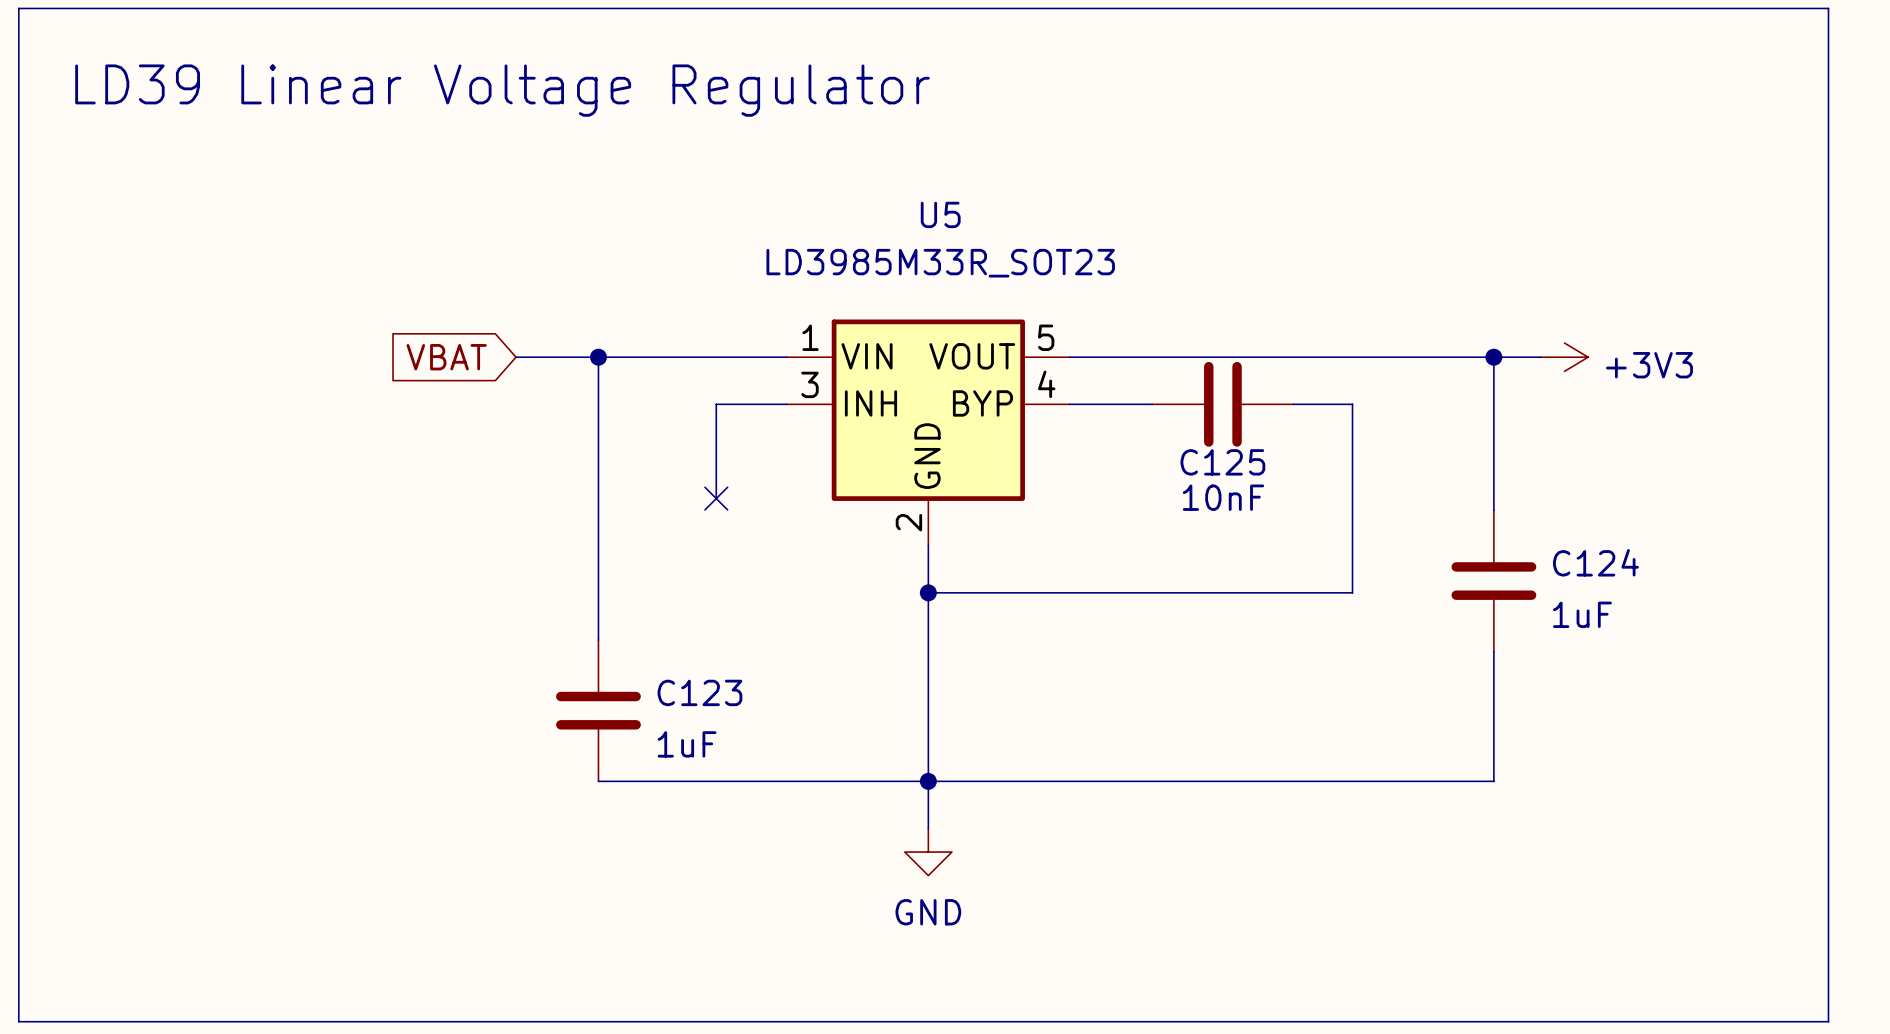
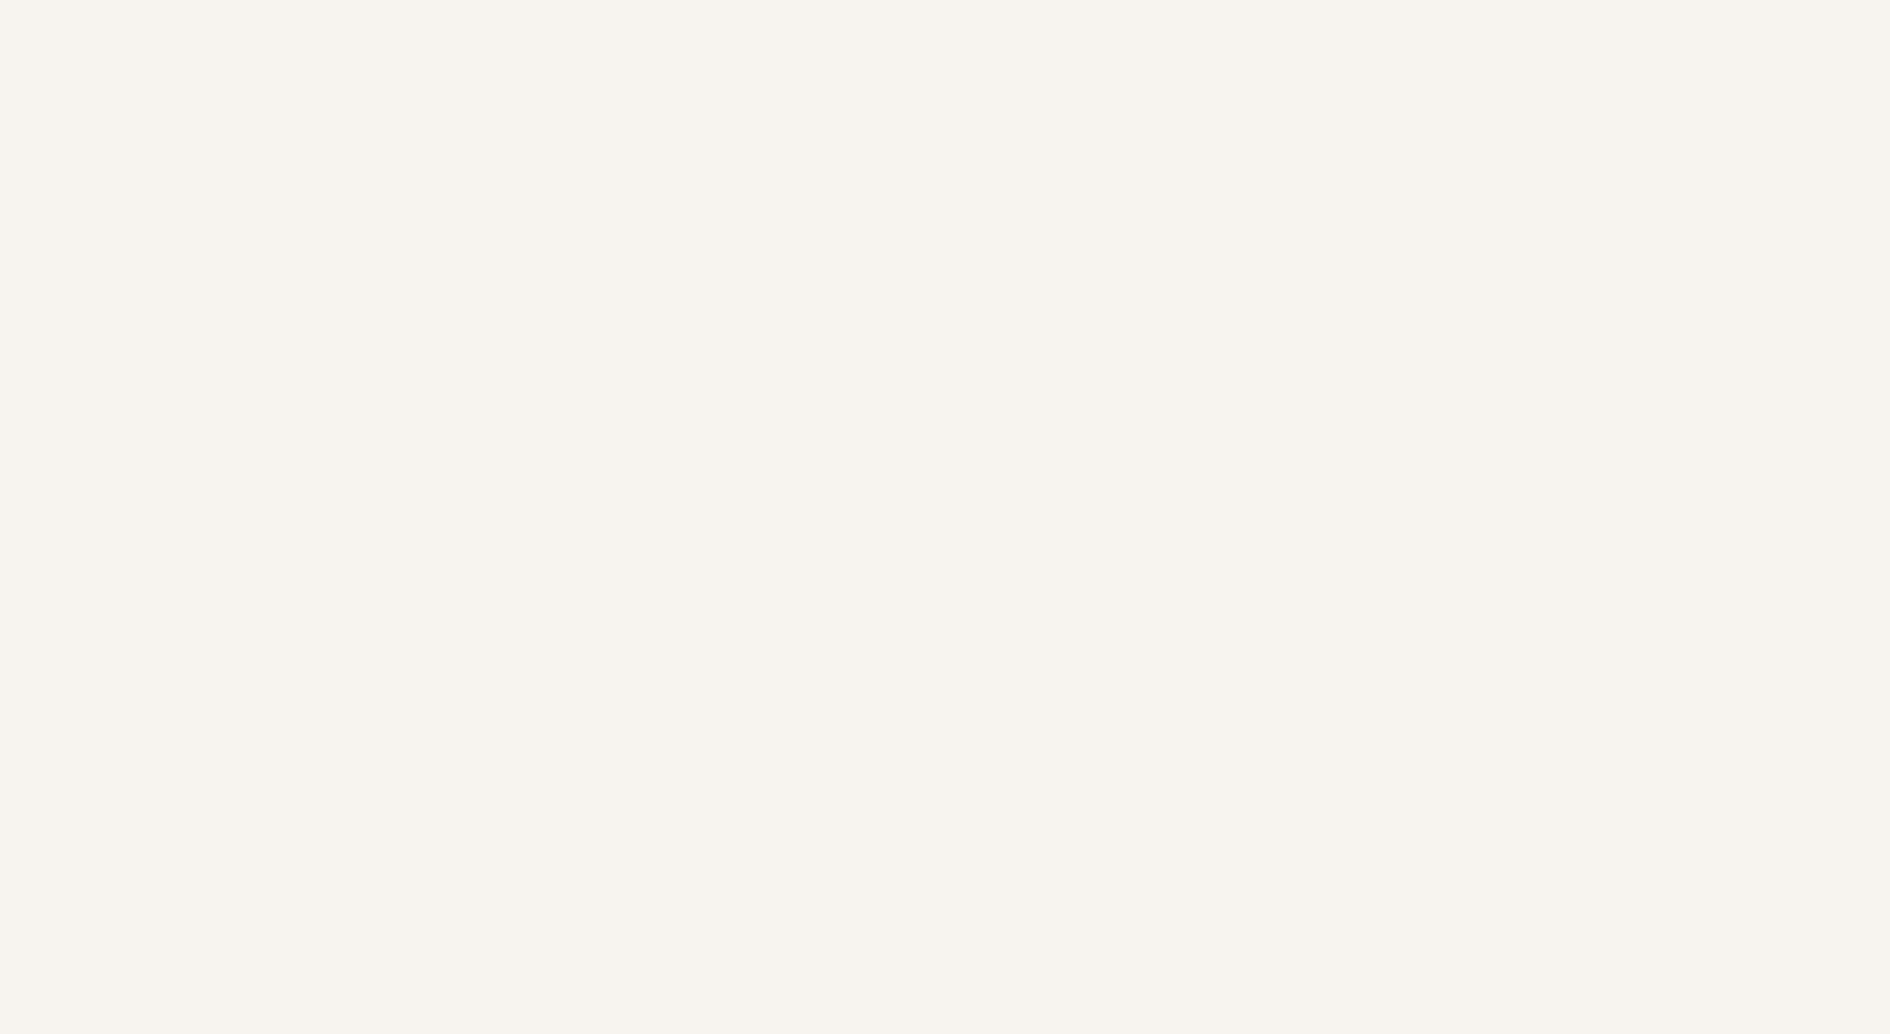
line: (18, 8) (1828, 8) (1828, 1021) (18, 1021) (18, 8) -> none
text: LD39 Linear Voltage Regulator (502, 90) -> none
global label: VBAT (446, 357) -> none
wire: (515, 357) (786, 357) -> none
wire: (598, 357) (598, 639) -> none
junction: (598, 357) -> none
wire: (1069, 357) (1541, 357) -> none
wire: (1493, 357) (1493, 510) -> none
junction: (1493, 357) -> none
power symbol: +3V3 (1564, 357) -> none
wire: (786, 404) (716, 404) (716, 498) -> none
wire: (1069, 404) (1152, 404) -> none
C125: 10nF (1222, 404) -> none
wire: (1293, 404) (1352, 404) (1352, 592) (928, 592) -> none
U5: LD3985M33R_SOT23 (928, 432) -> none
no-connect mark: (716, 498) -> none
wire: (928, 545) (928, 828) -> none
C124: 1uF (1493, 581) -> none
junction: (928, 592) -> none
wire: (1493, 651) (1493, 781) (598, 781) -> none
C123: 1uF (598, 710) -> none
junction: (928, 781) -> none
power symbol: GND (928, 852) -> none

